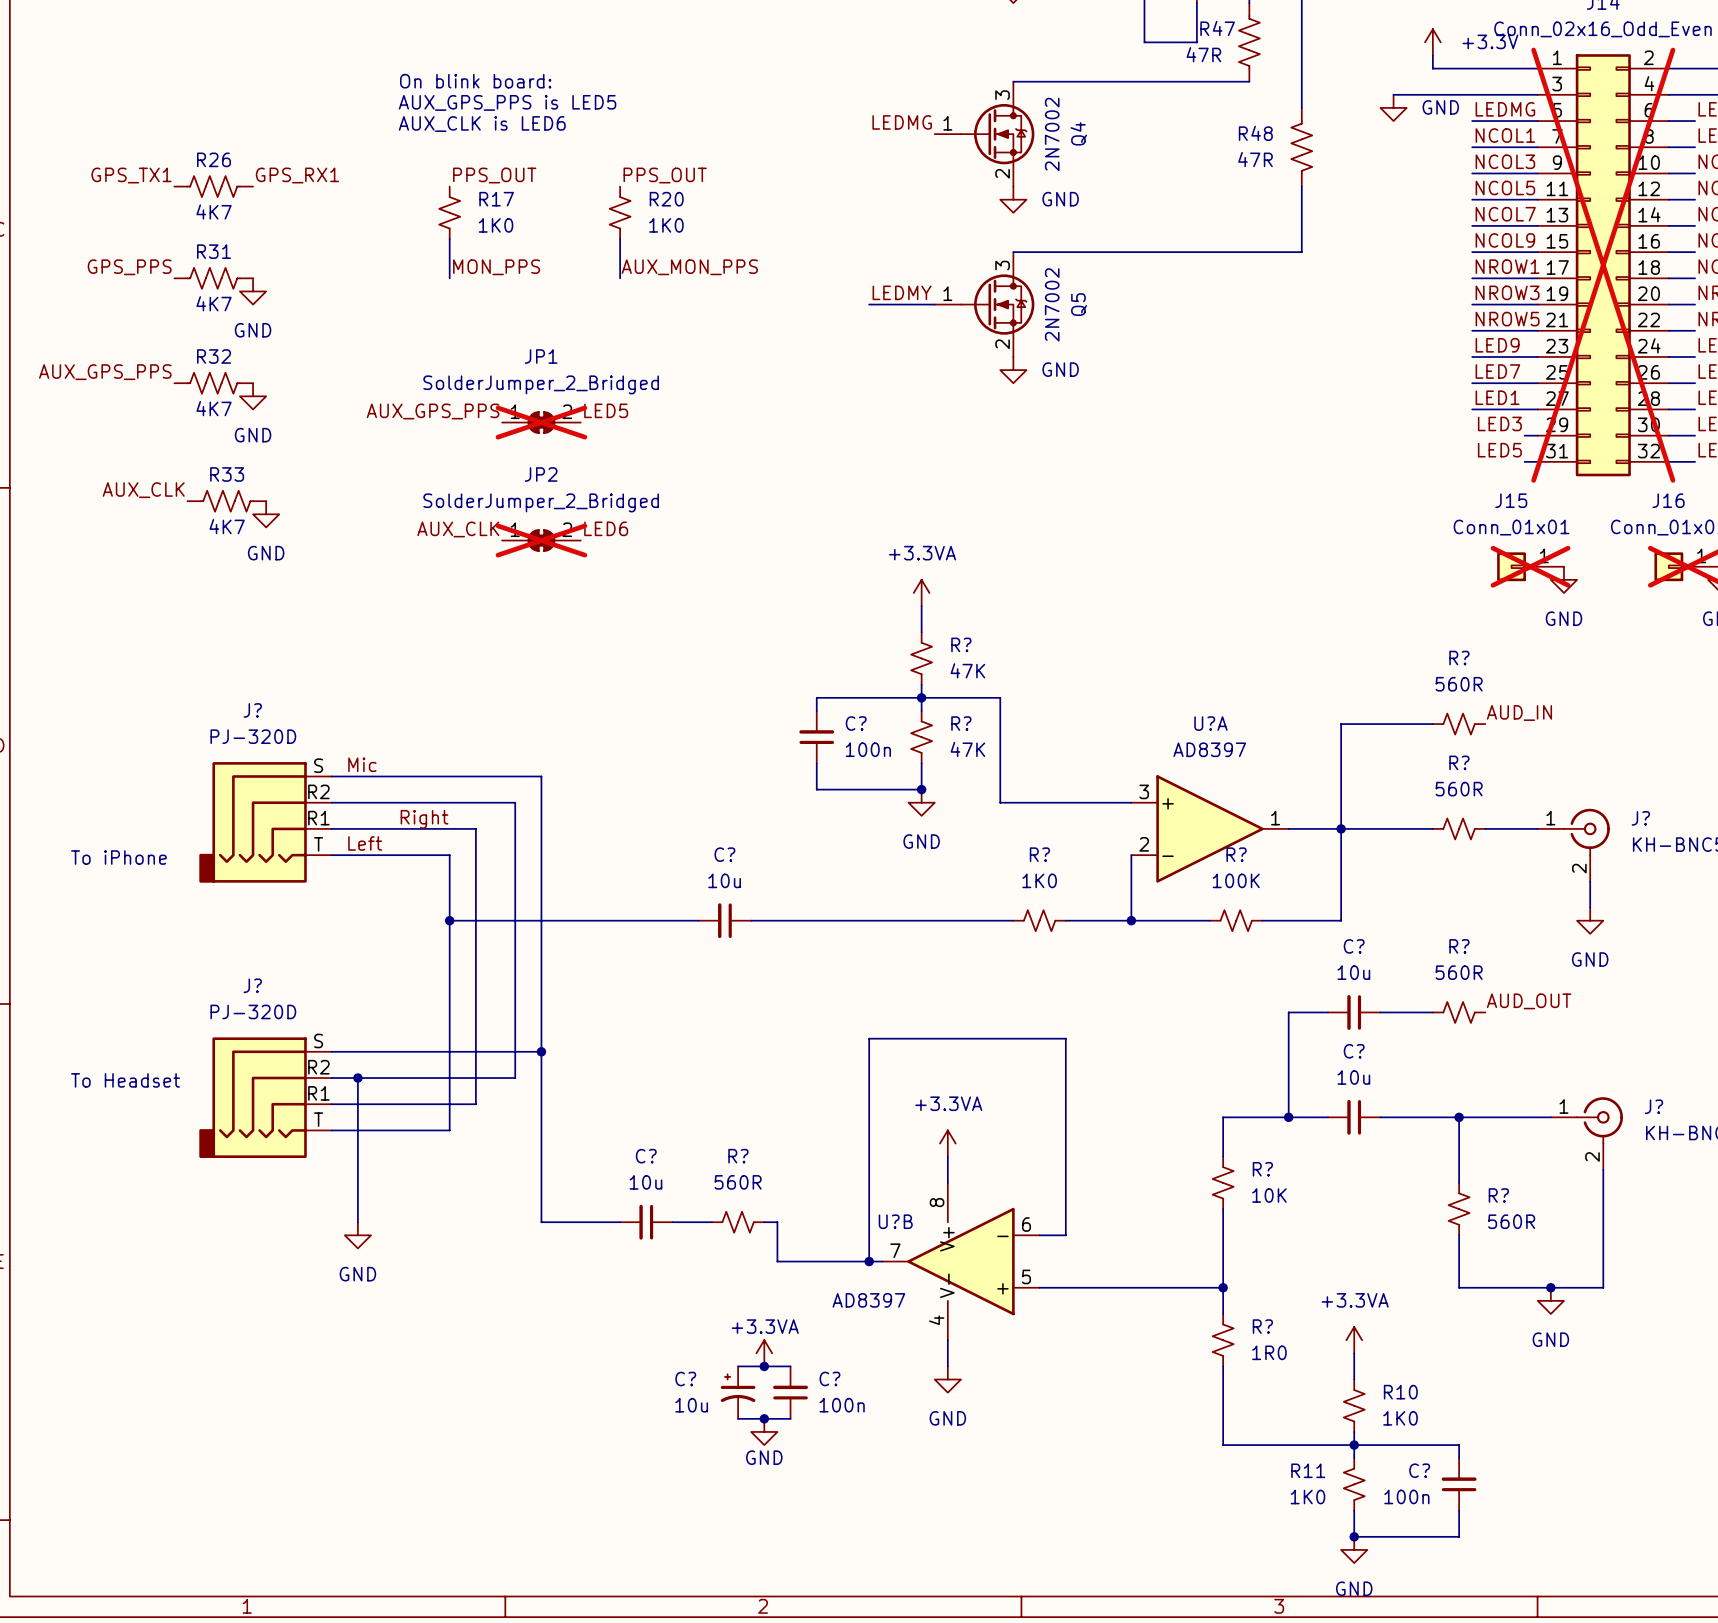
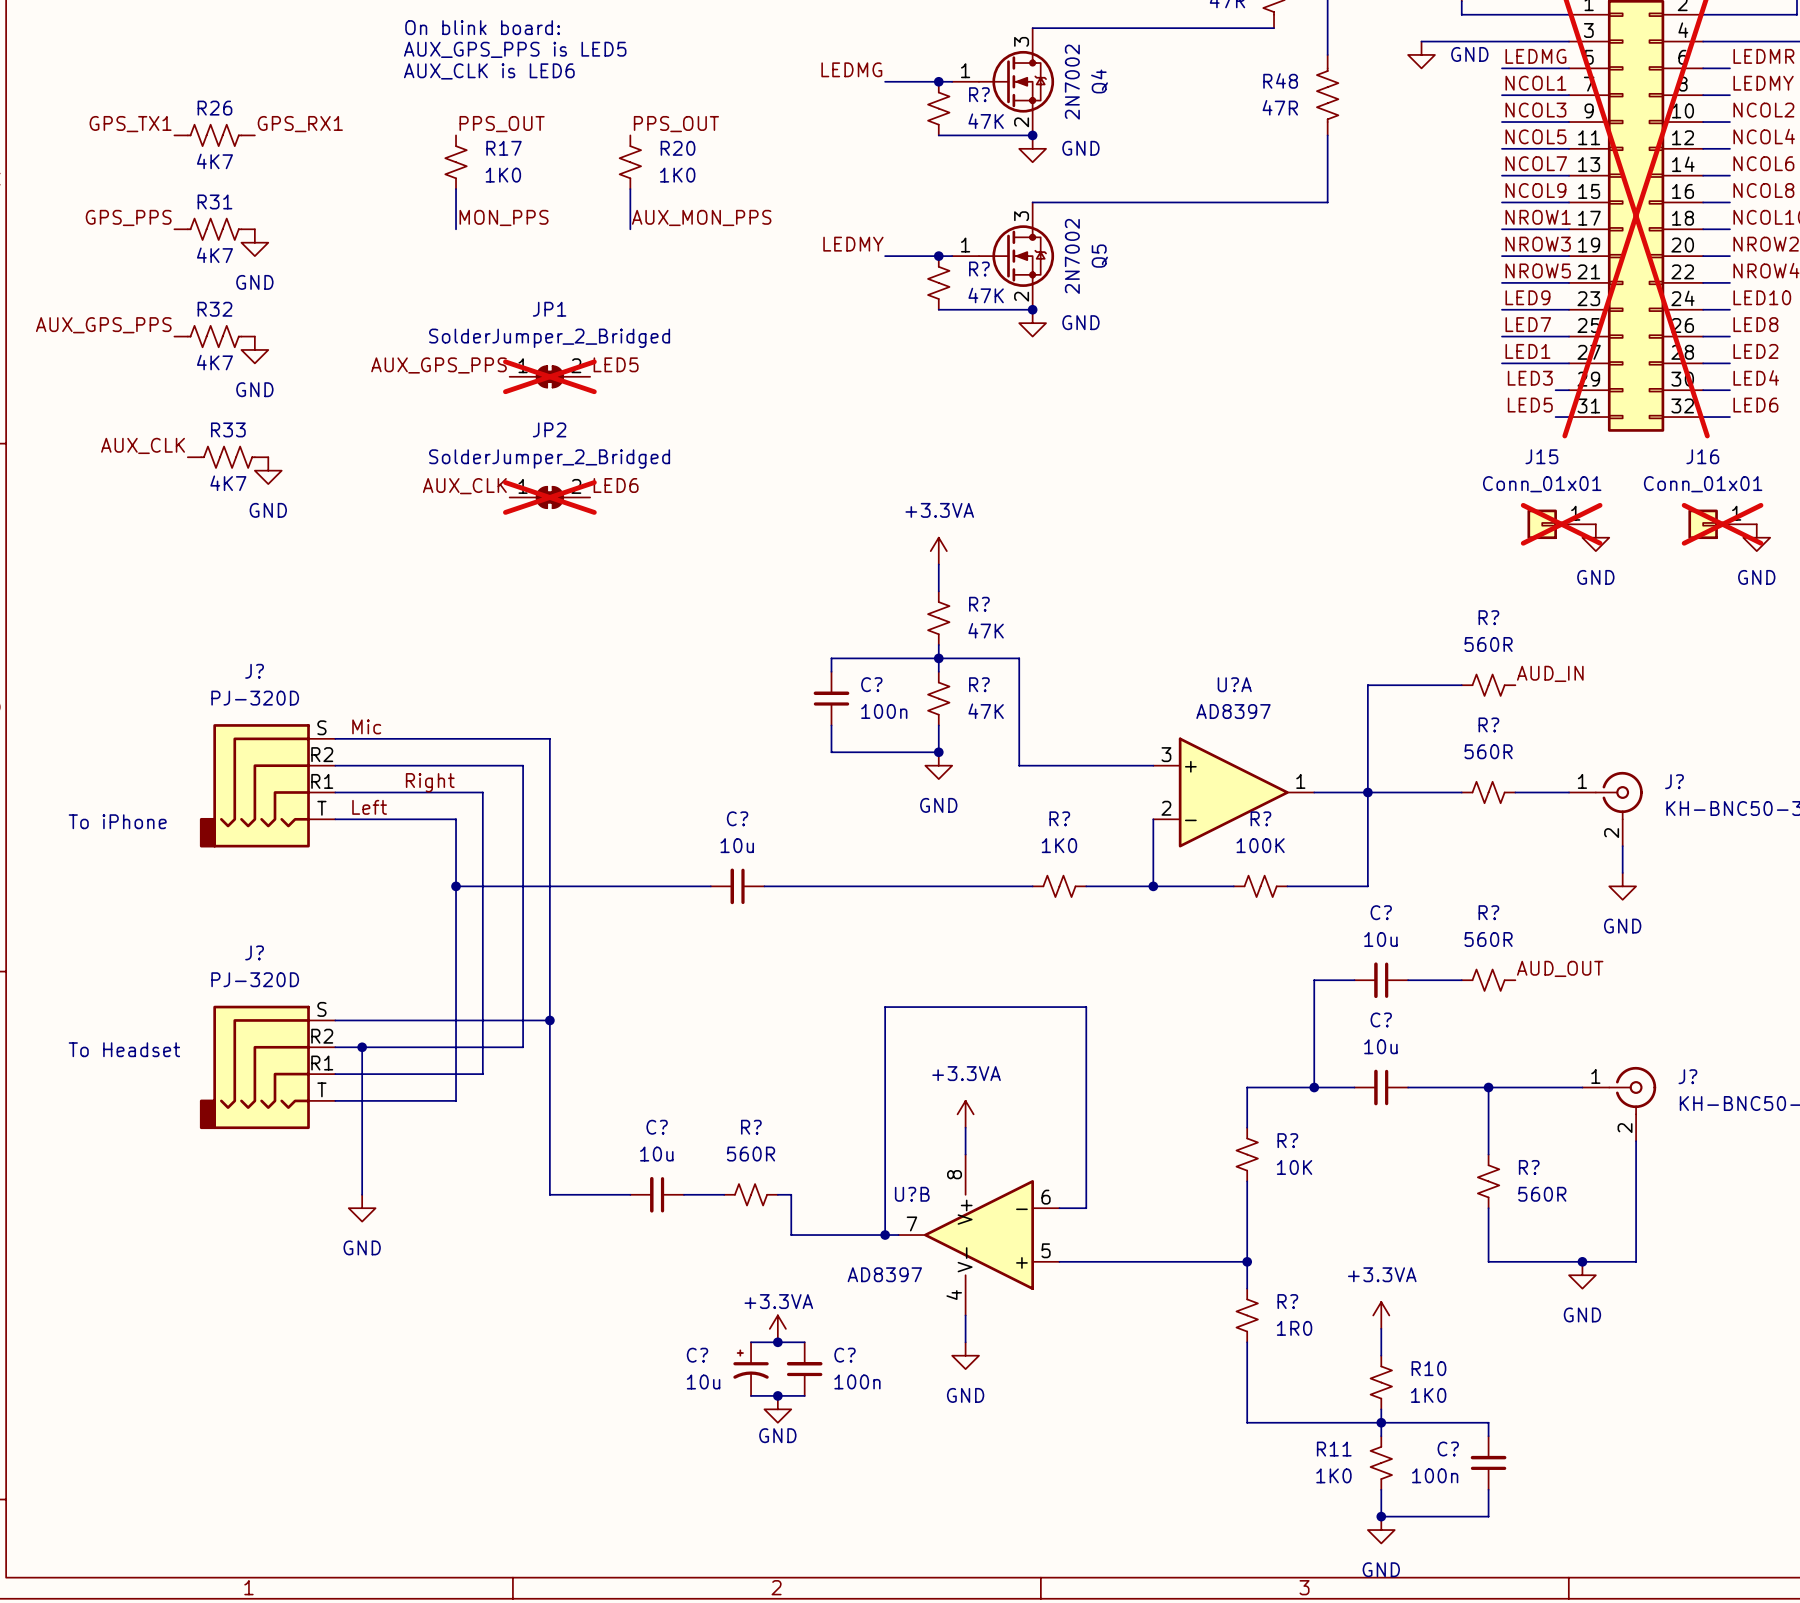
label position: LEDMG (902, 122) -> LEDMG (851, 69)
wire: none -> (885, 81) (952, 81)
junction: none -> (938, 81)
R?: none -> 47K (938, 108)
wire: none -> (938, 135) (1032, 135)
junction: none -> (1032, 135)
label position: LEDMY (902, 292) -> LEDMY (853, 244)
junction: none -> (938, 256)
R?: none -> 47K (938, 282)
wire: none -> (938, 309) (1032, 309)
junction: none -> (1032, 309)

